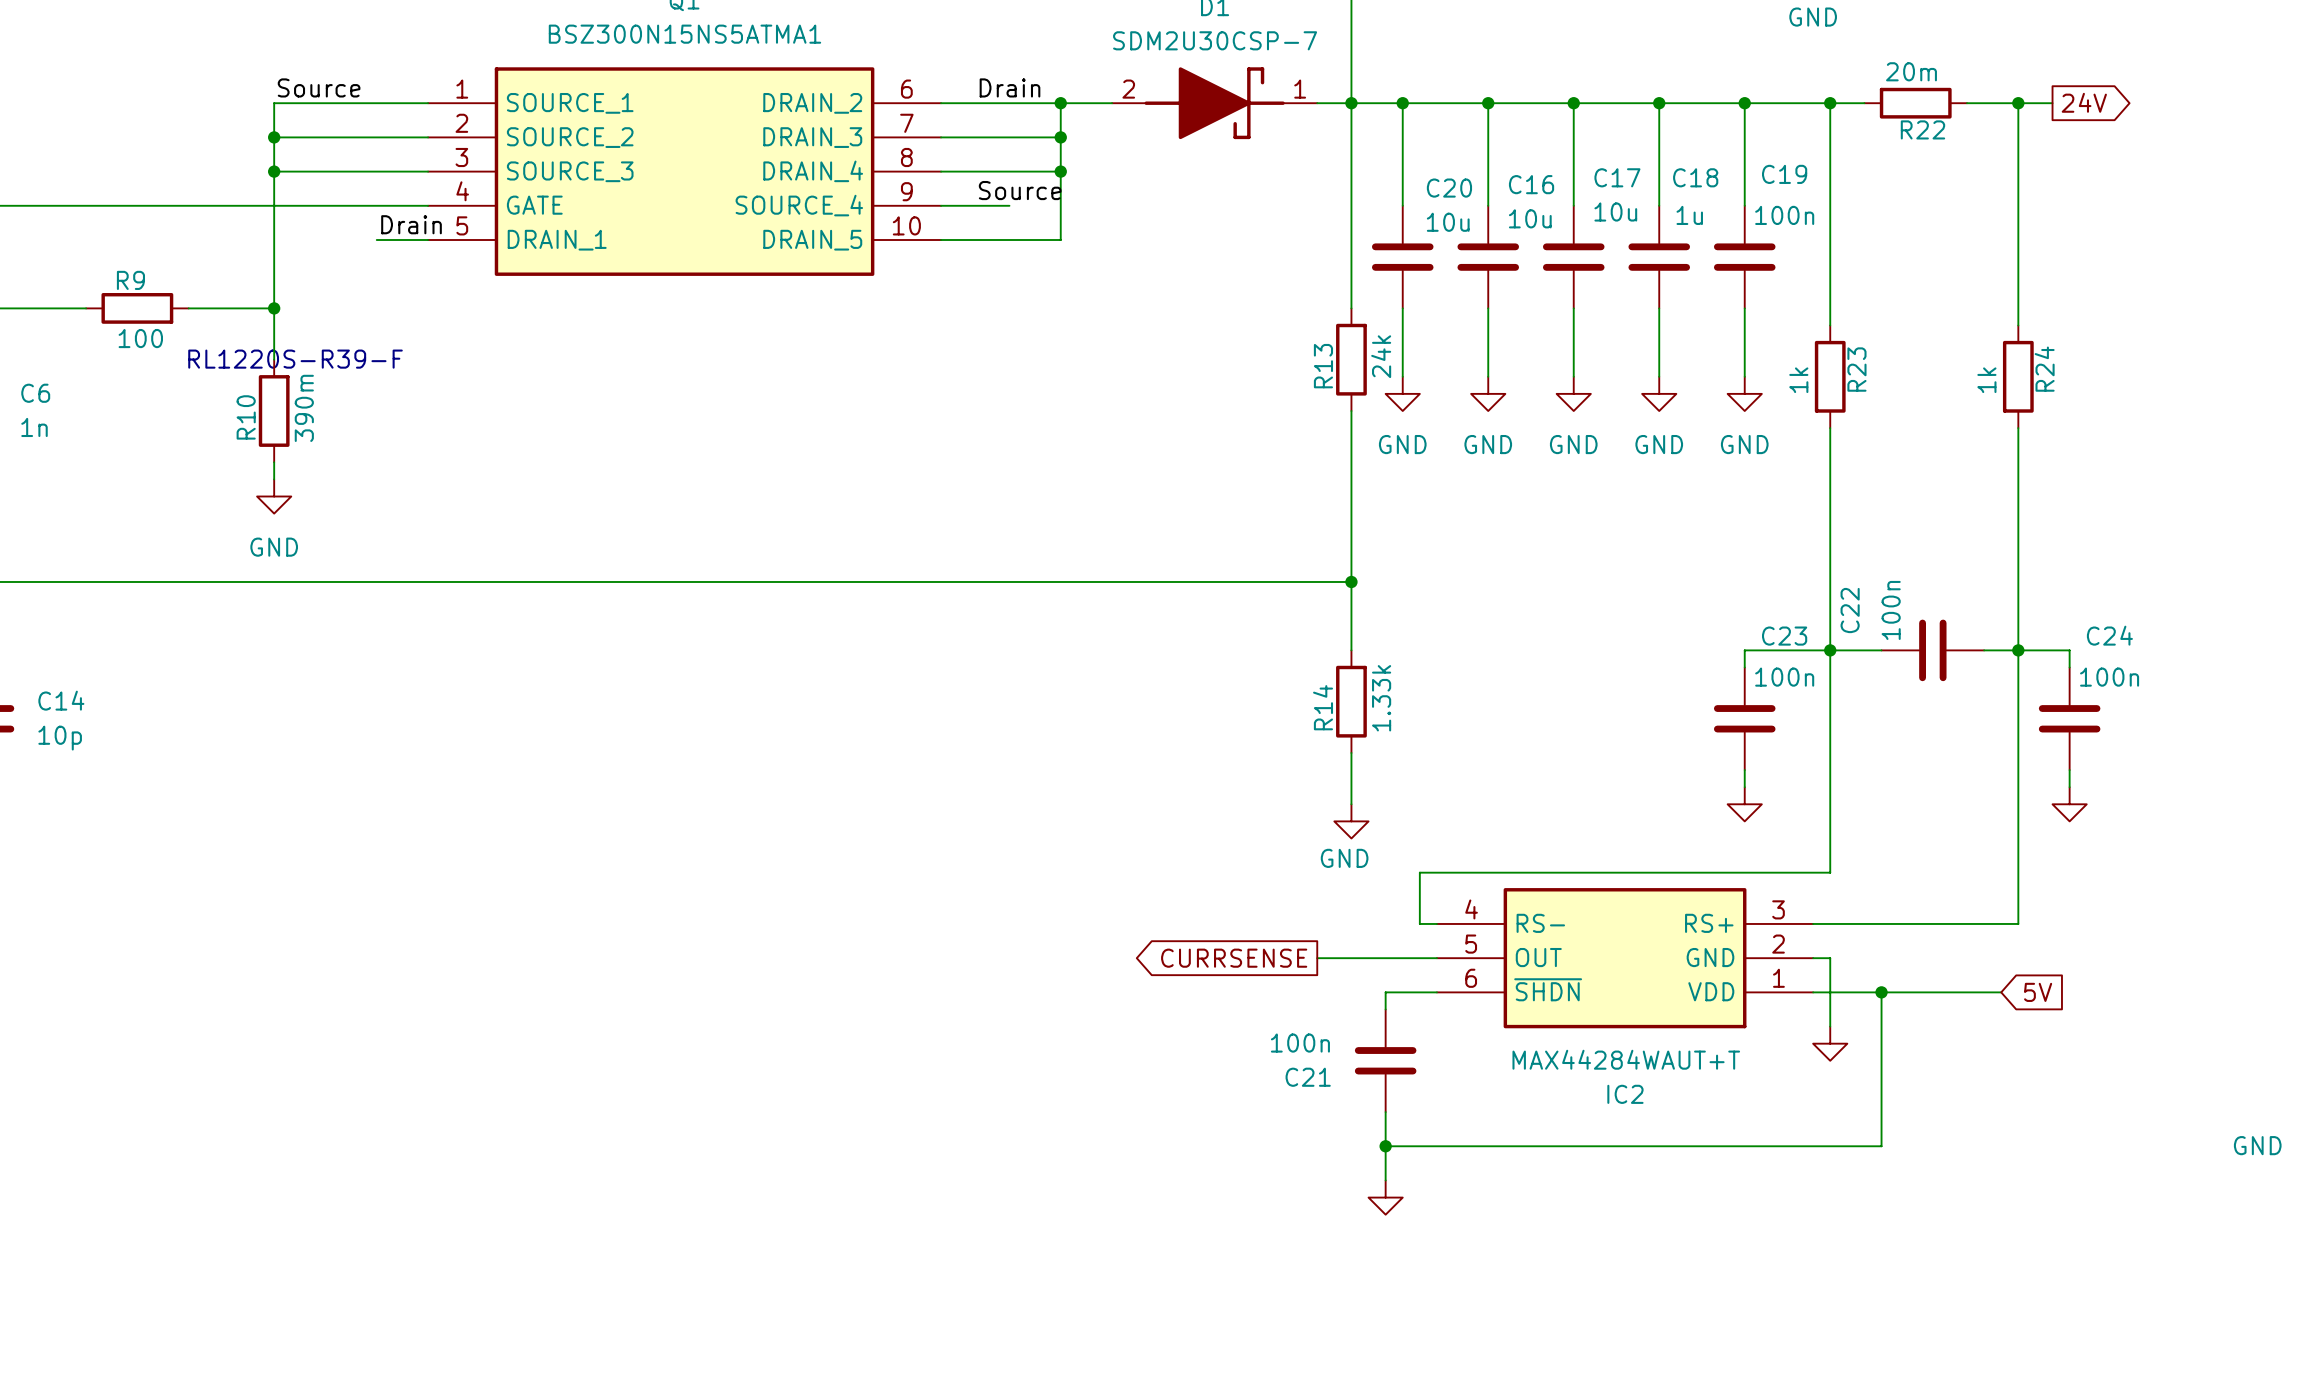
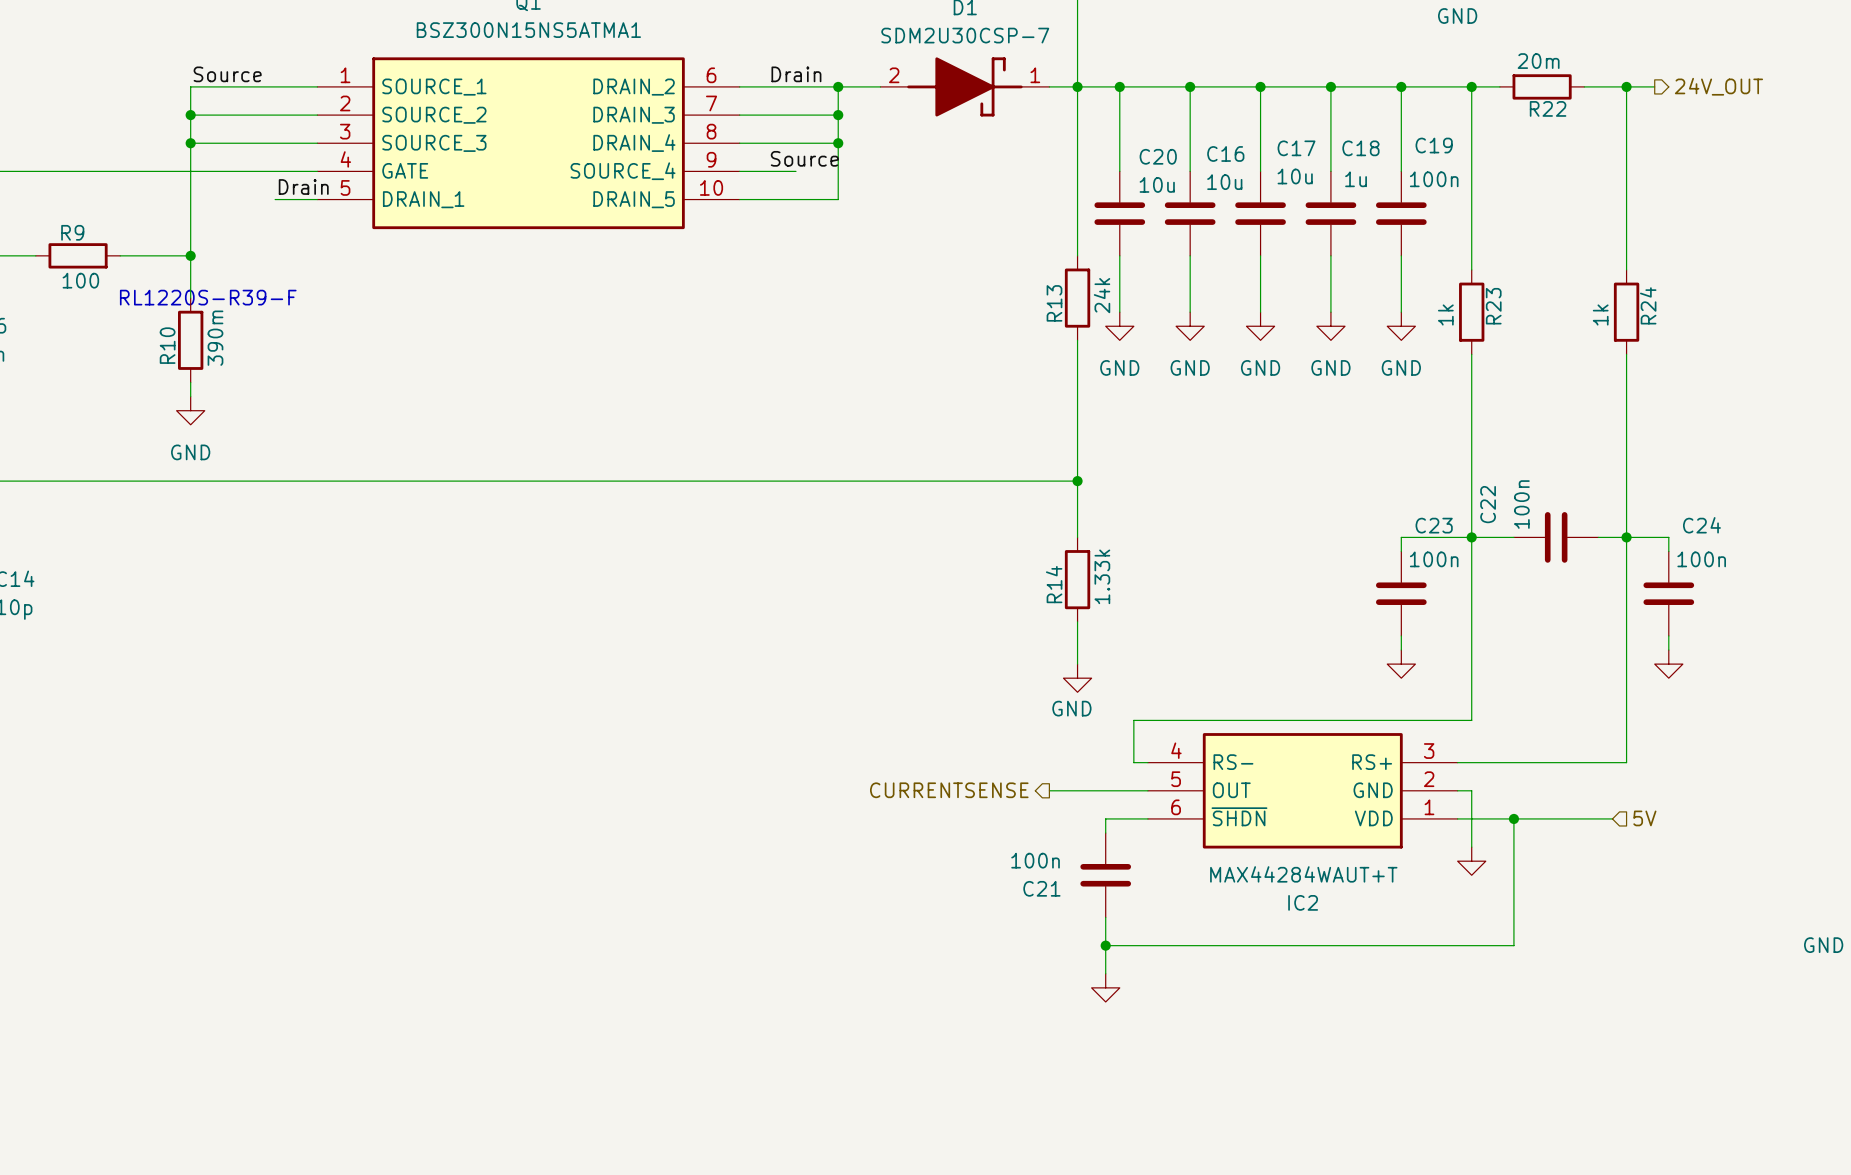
global label: 24V (2084, 102) -> none
hierarchical label: none -> 24V_OUT (1718, 86)
hierarchical label: none -> CURRENTSENSE (949, 790)
global label: CURRSENSE (1234, 958) -> none
hierarchical label: none -> 5V (1644, 818)
global label: 5V (2038, 992) -> none

